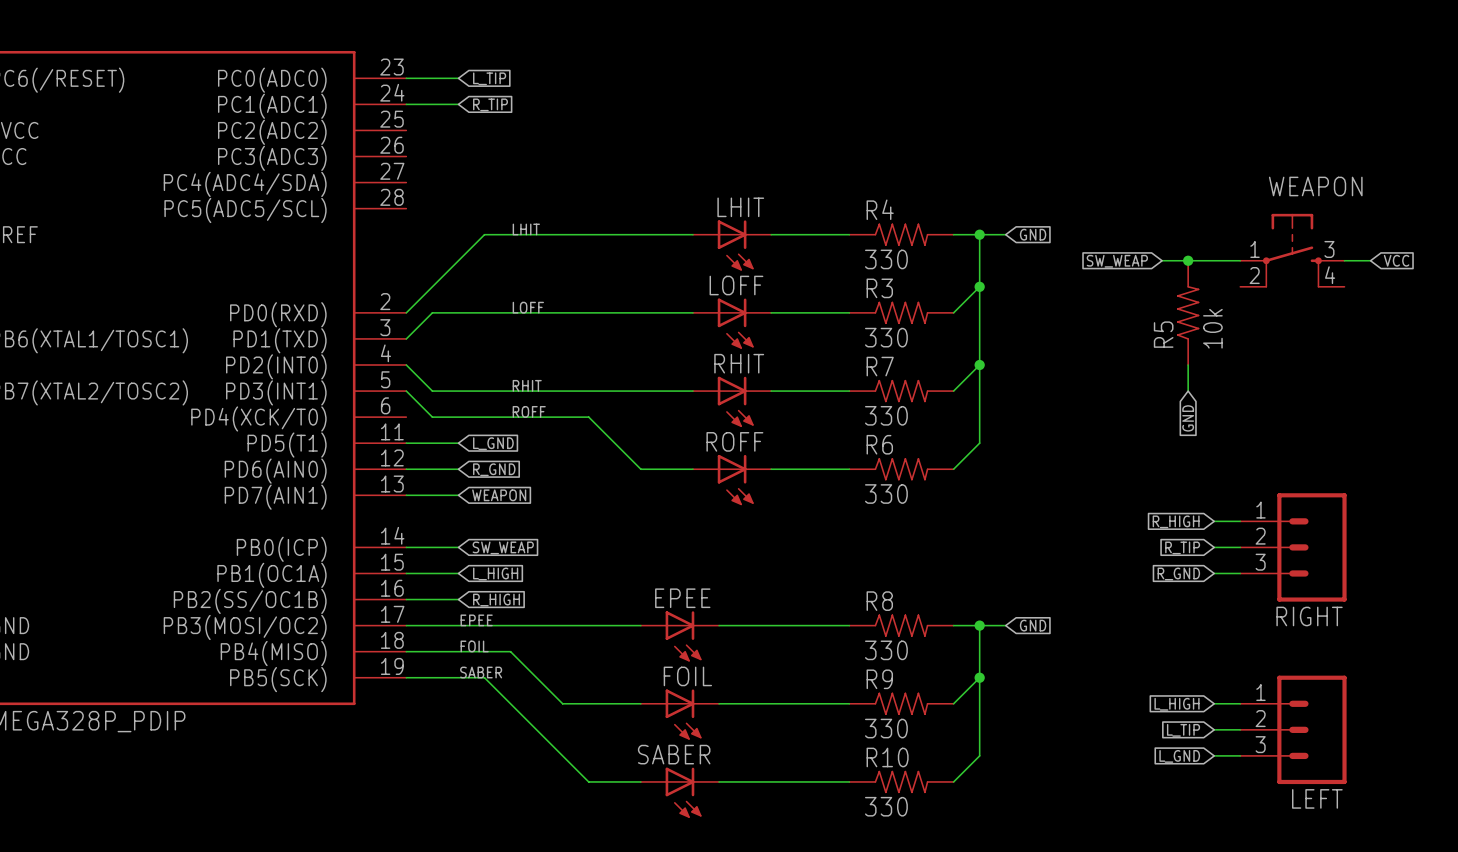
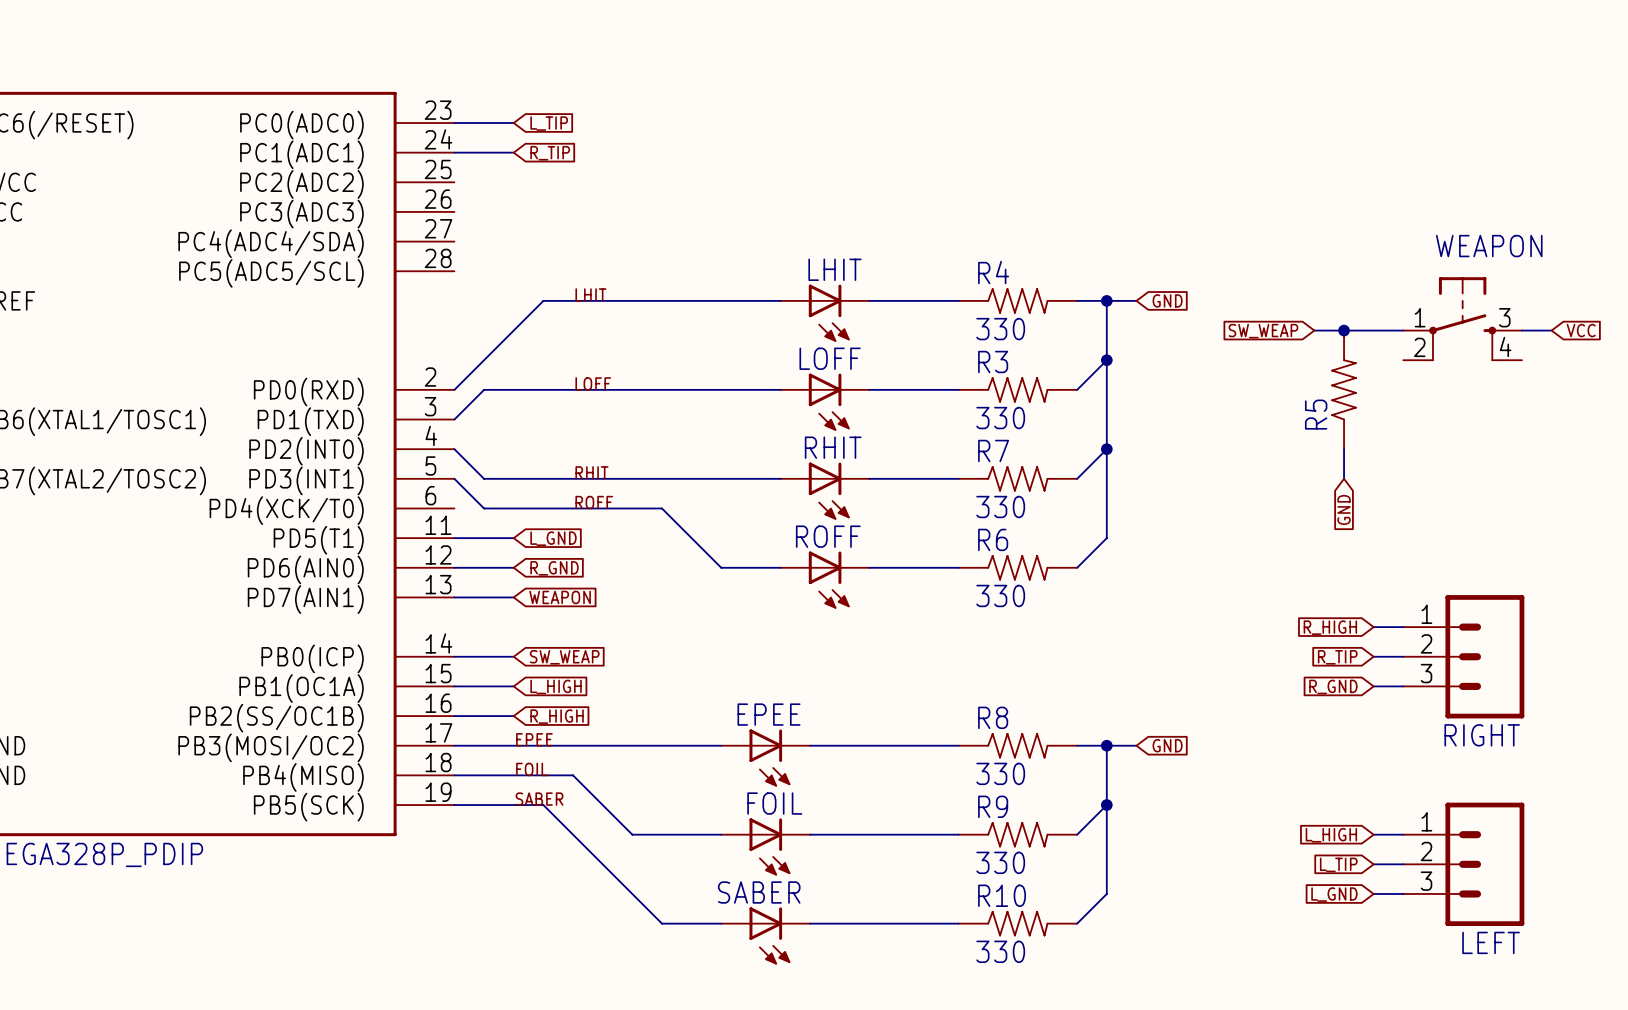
R5 value: 10k (1212, 328) -> none

